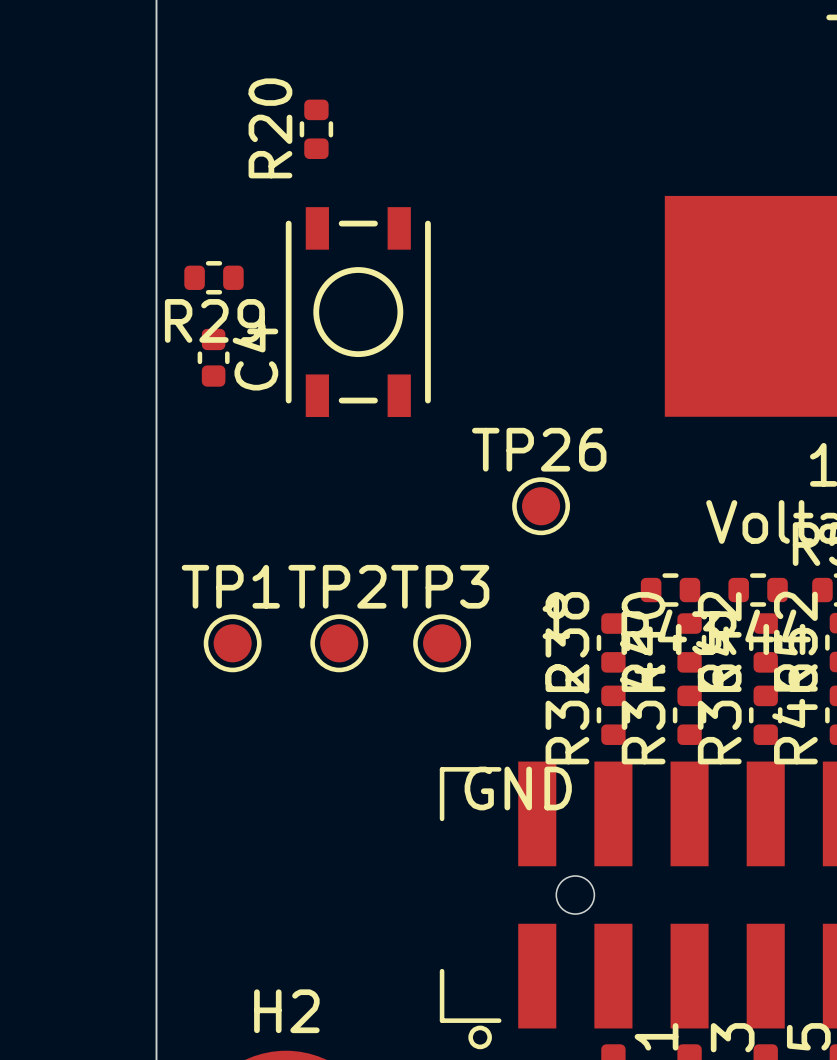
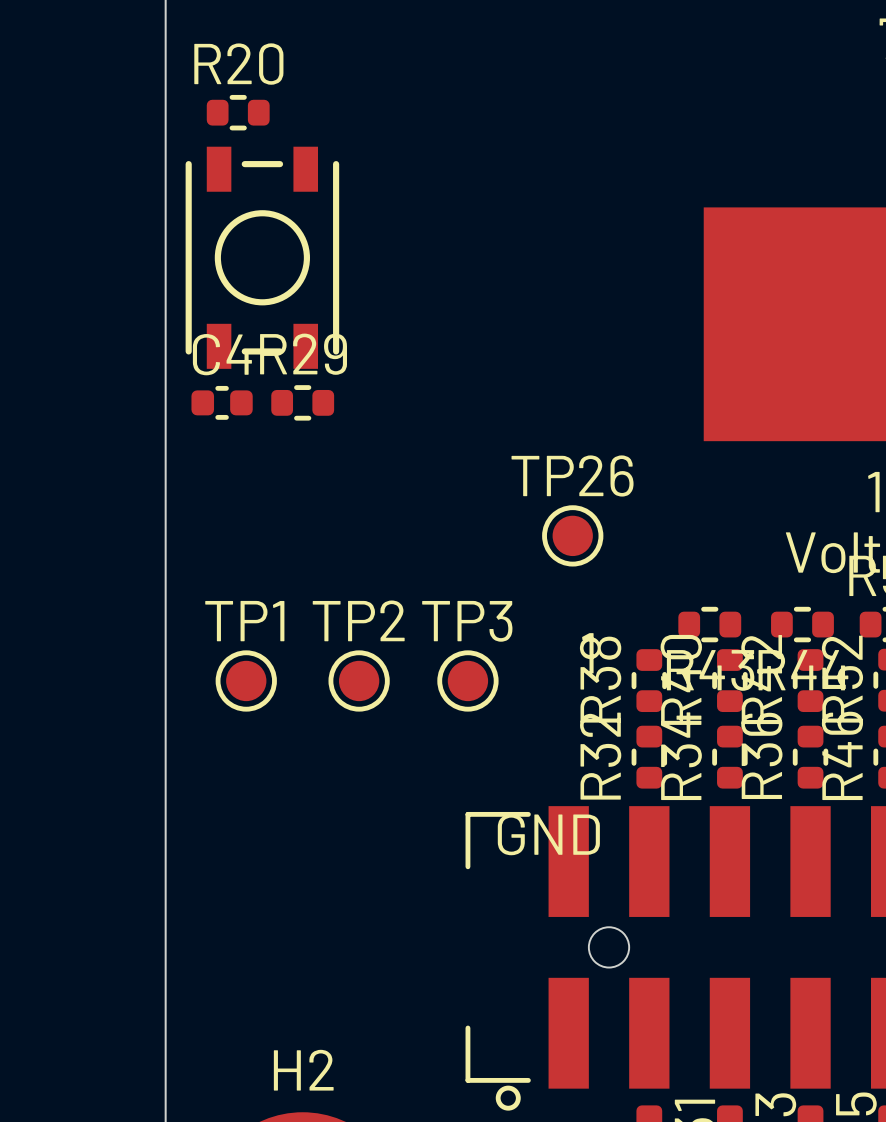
R20 rotation: 0° (316, 129) -> 90° clockwise (238, 112)
R20 position: (316, 129) -> (238, 112)
R29 position: (213, 277) -> (302, 402)
part position: (358, 312) -> (262, 257)
R29 name position: R29 (214, 320) -> R29 (303, 354)
C4 rotation: 0° (213, 357) -> 90° clockwise (222, 402)

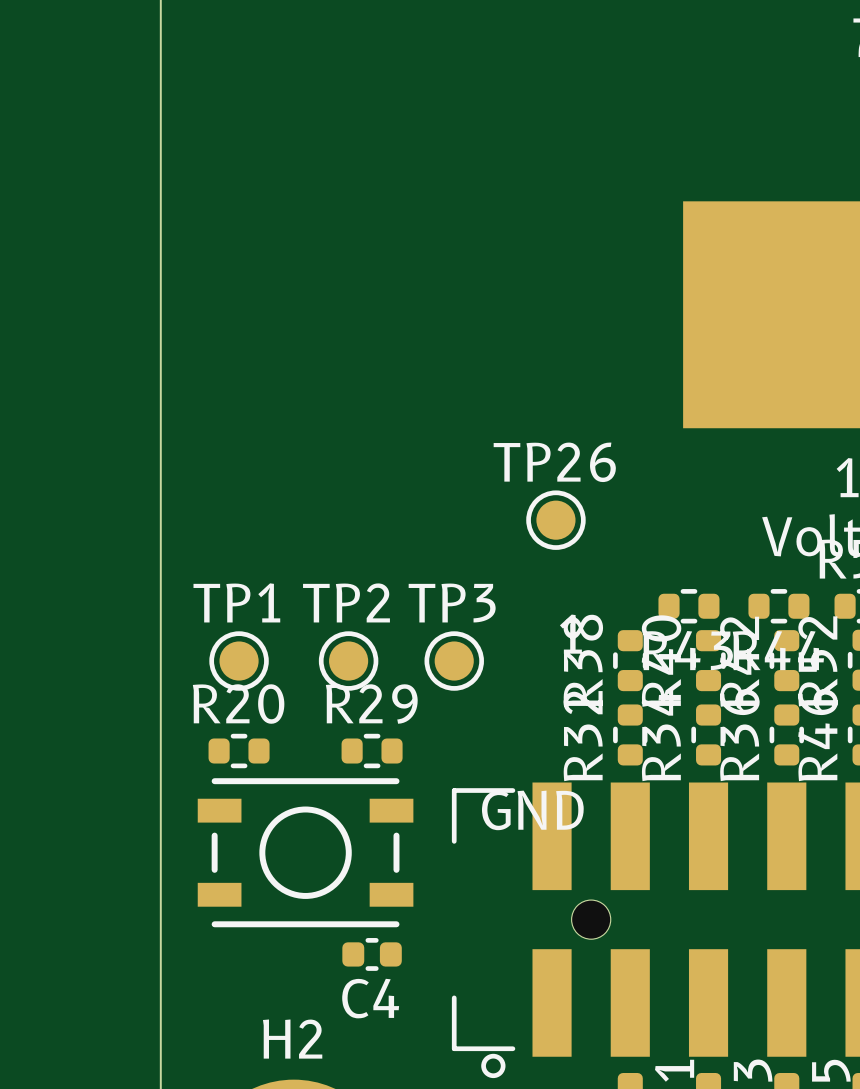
R20 position: (238, 112) -> (239, 751)
part rotation: 0° (262, 257) -> 90° clockwise (305, 852)
part position: (262, 257) -> (305, 852)
C4 name position: C4 (222, 354) -> C4 (370, 998)
C4 position: (222, 402) -> (372, 954)
R29 position: (302, 402) -> (372, 751)

